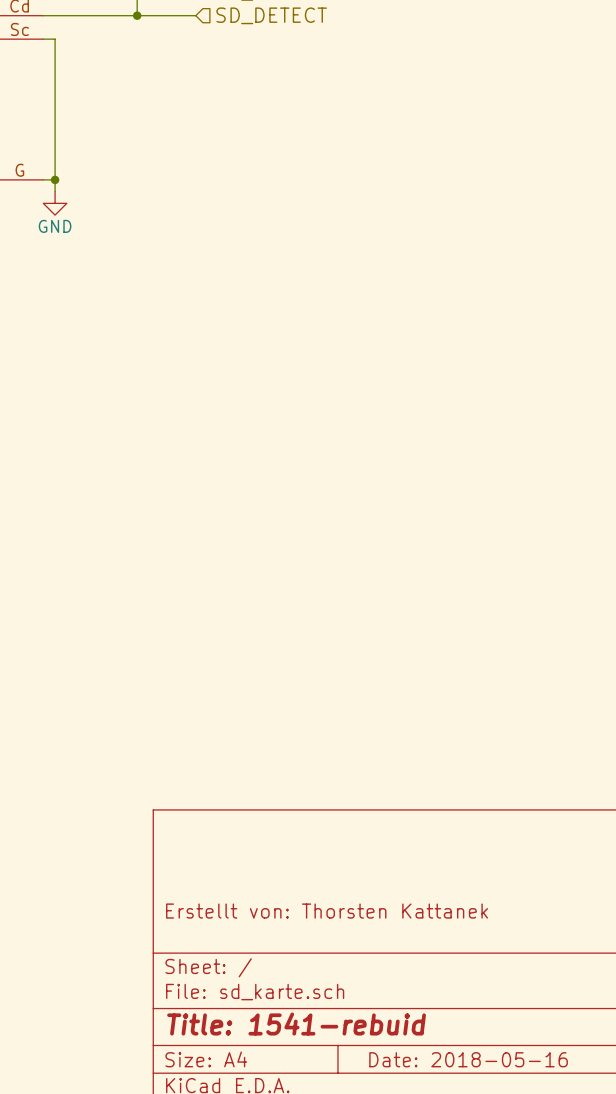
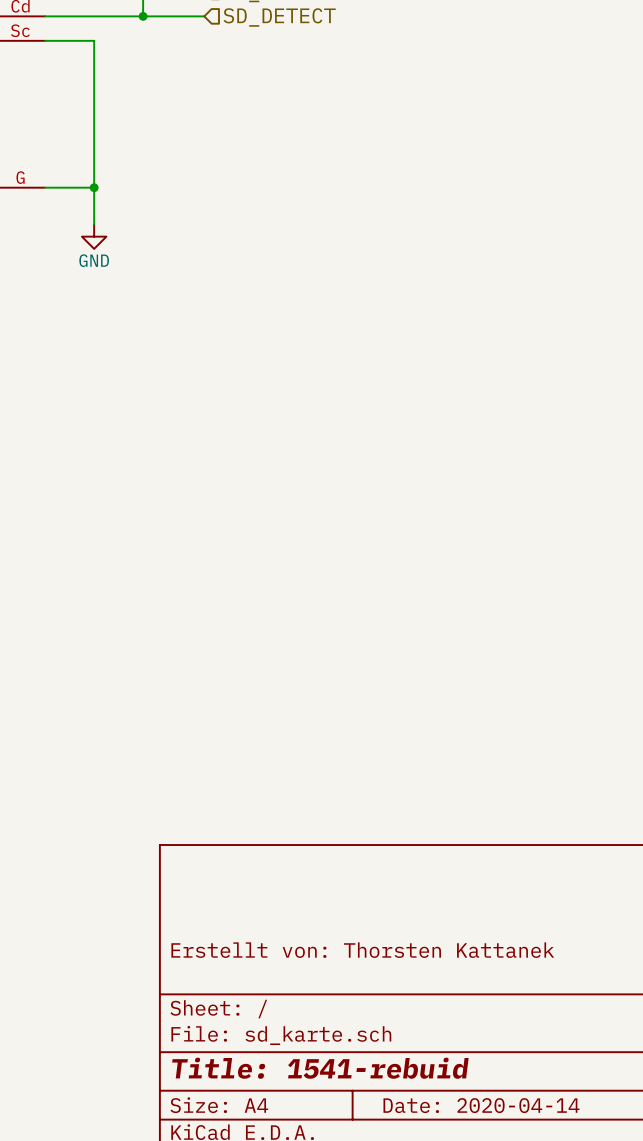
wire: (55, 39) (55, 191) -> (57, 40) (94, 40) (94, 224)
wire: none -> (57, 187) (94, 187)
junction position: (55, 179) -> (94, 187)
power symbol position: GND (55, 203) -> GND (94, 236)
title block: Date: 2018-05-16 (468, 1059) -> Date: 2020-04-14 (481, 1105)

